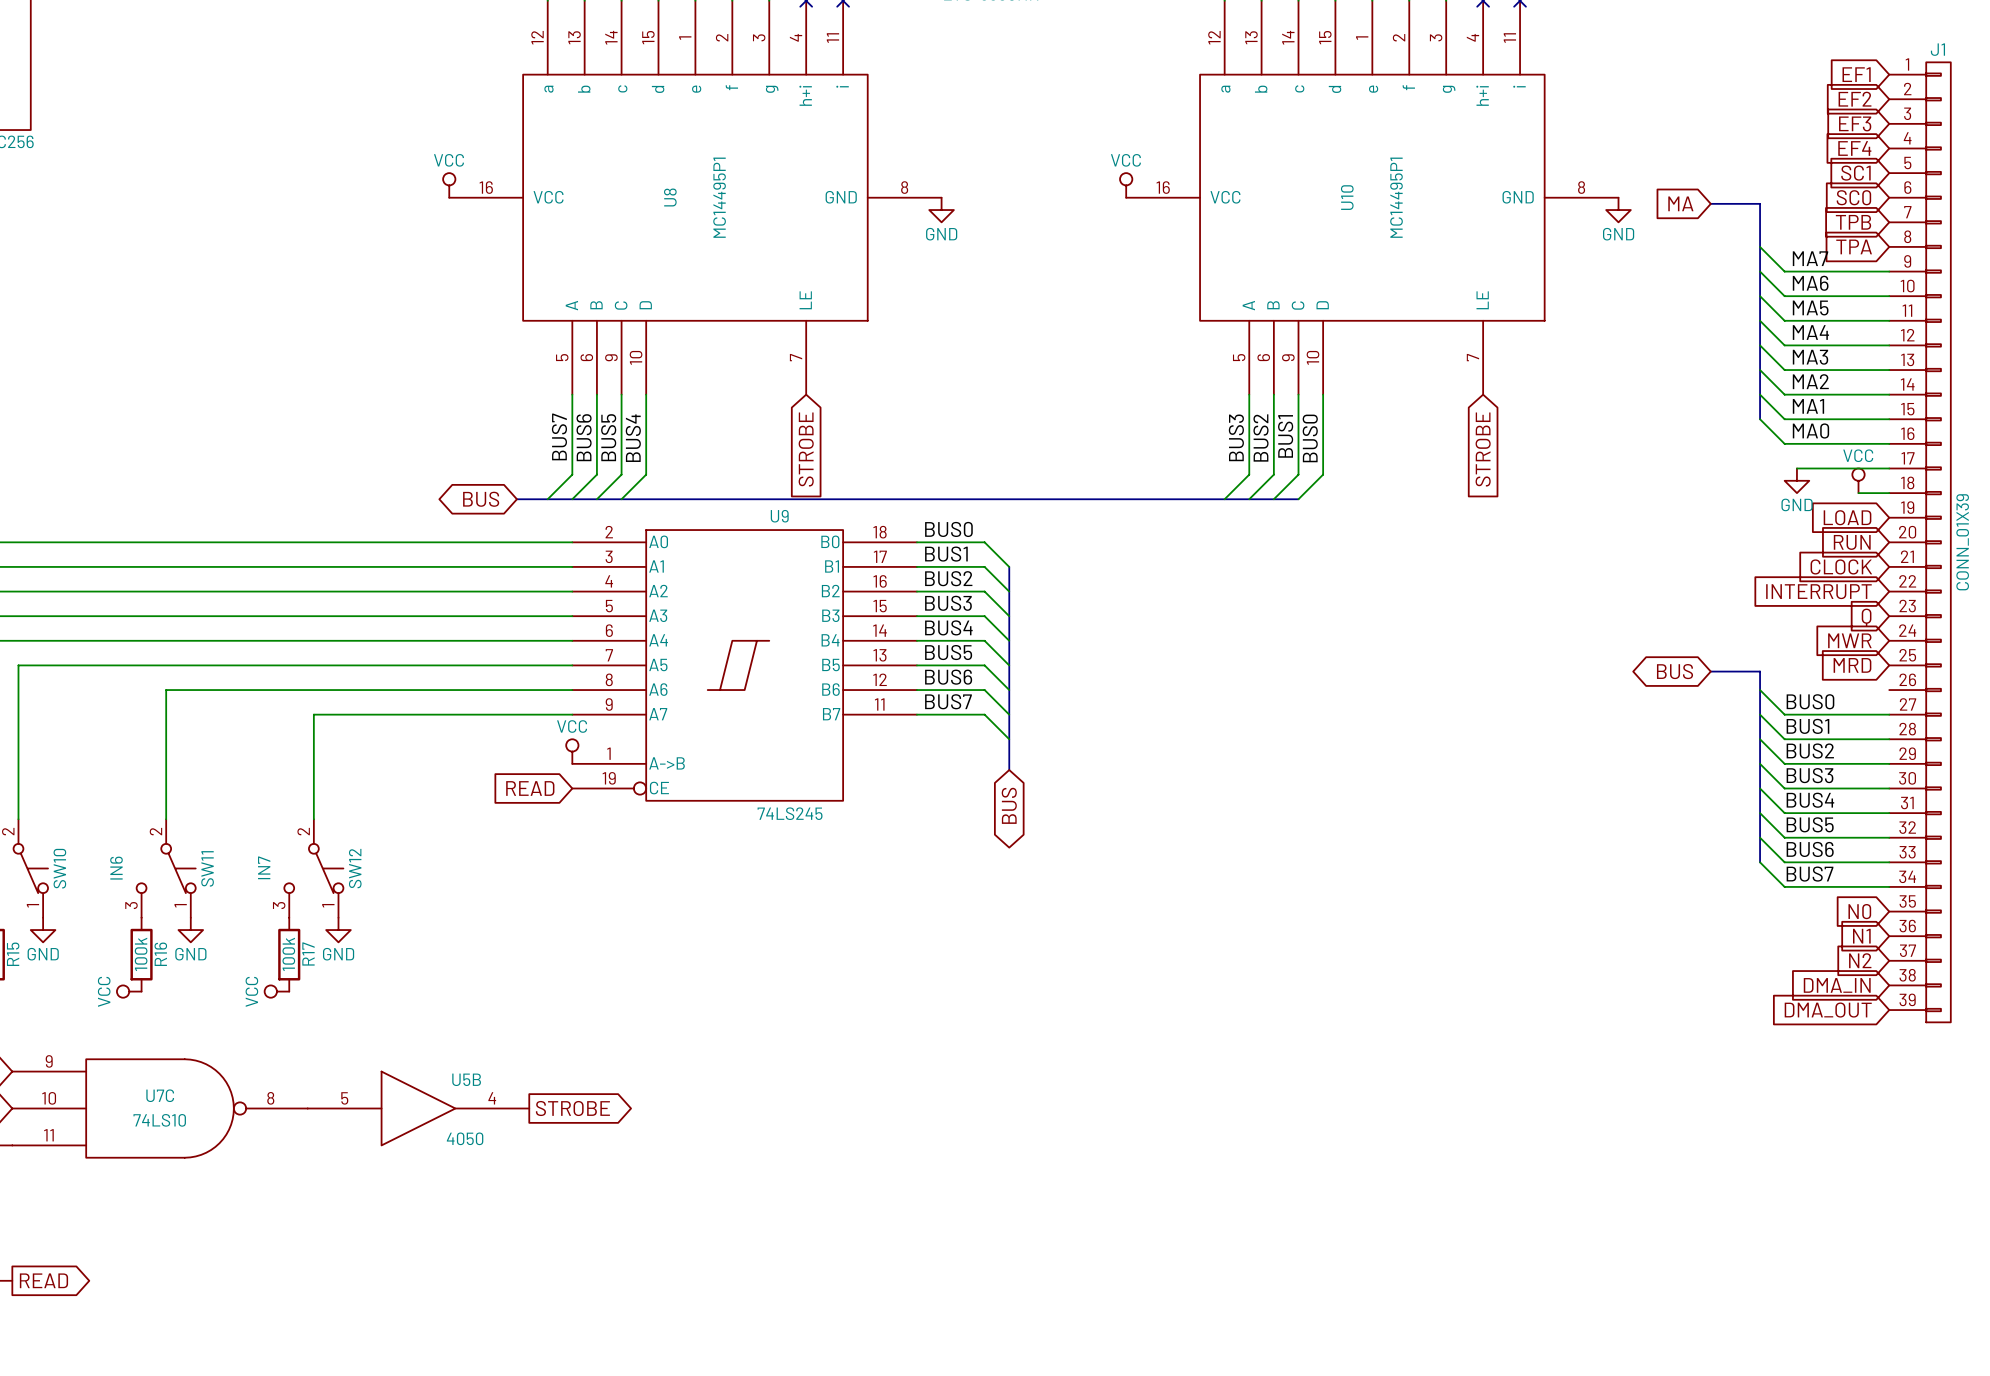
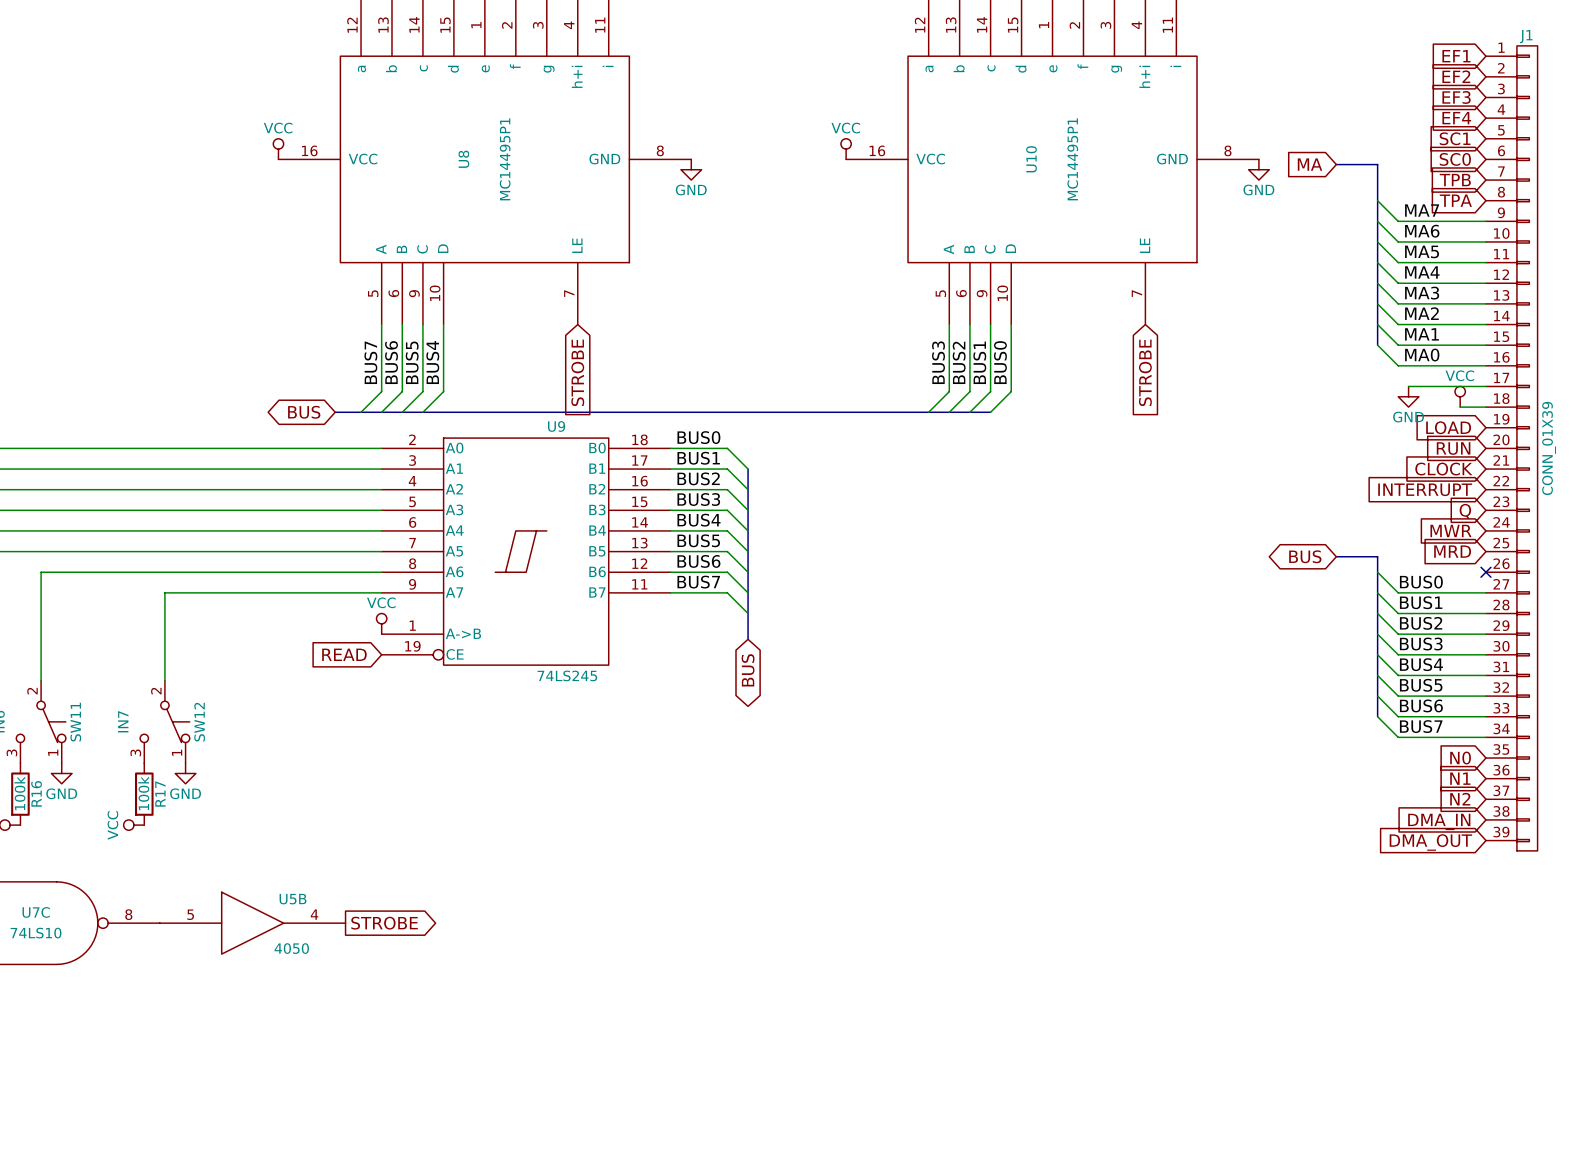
no-connect mark: none -> (1485, 572)

